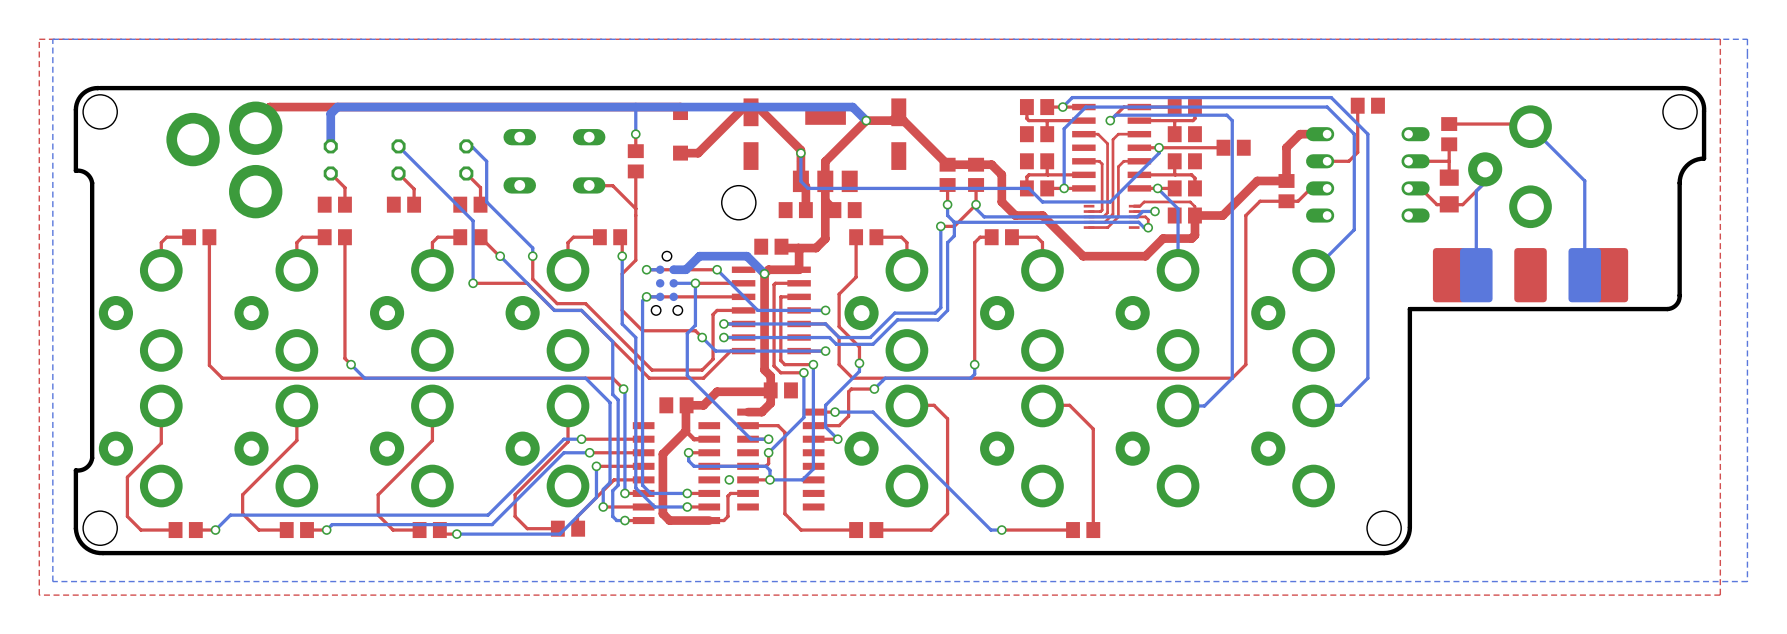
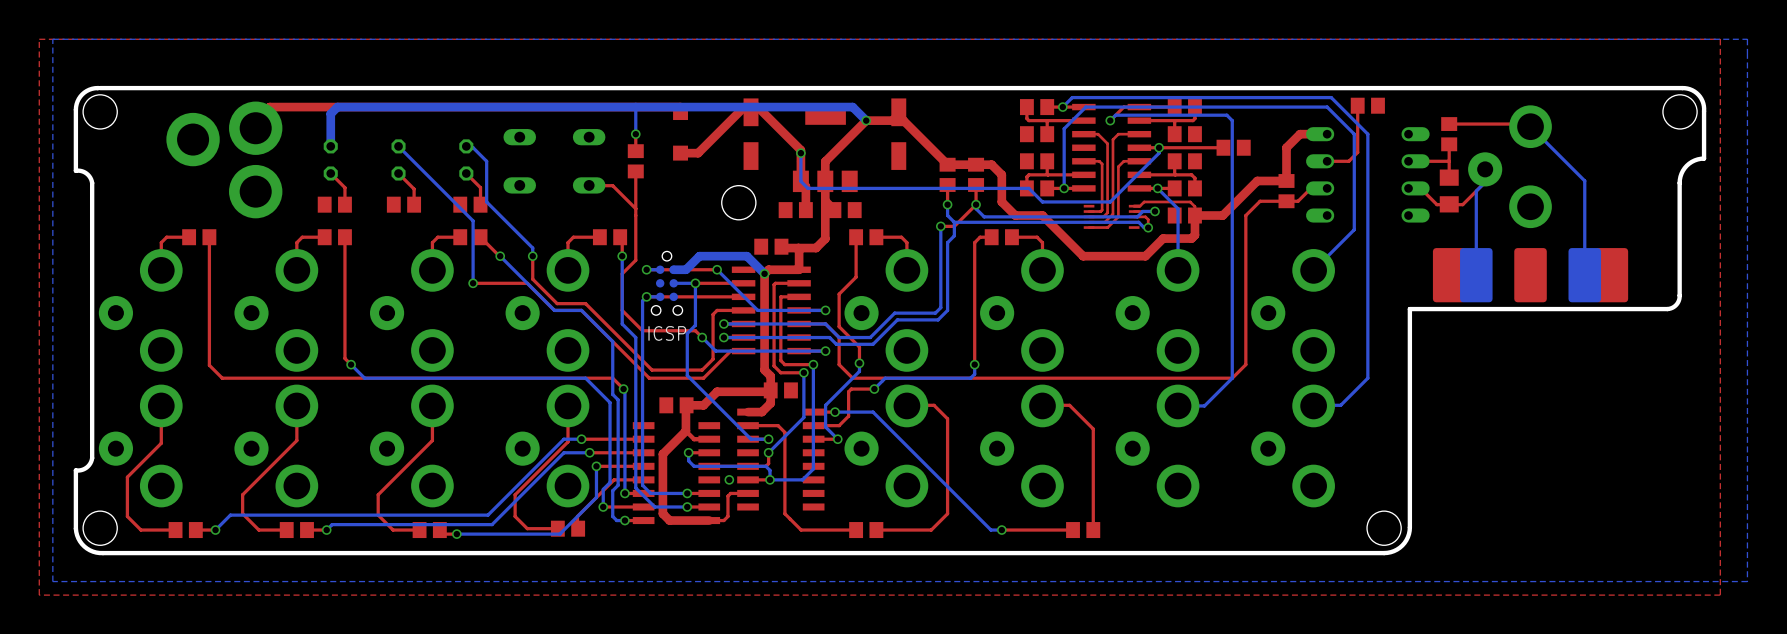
ICSP name: none -> ICSP (667, 333)

